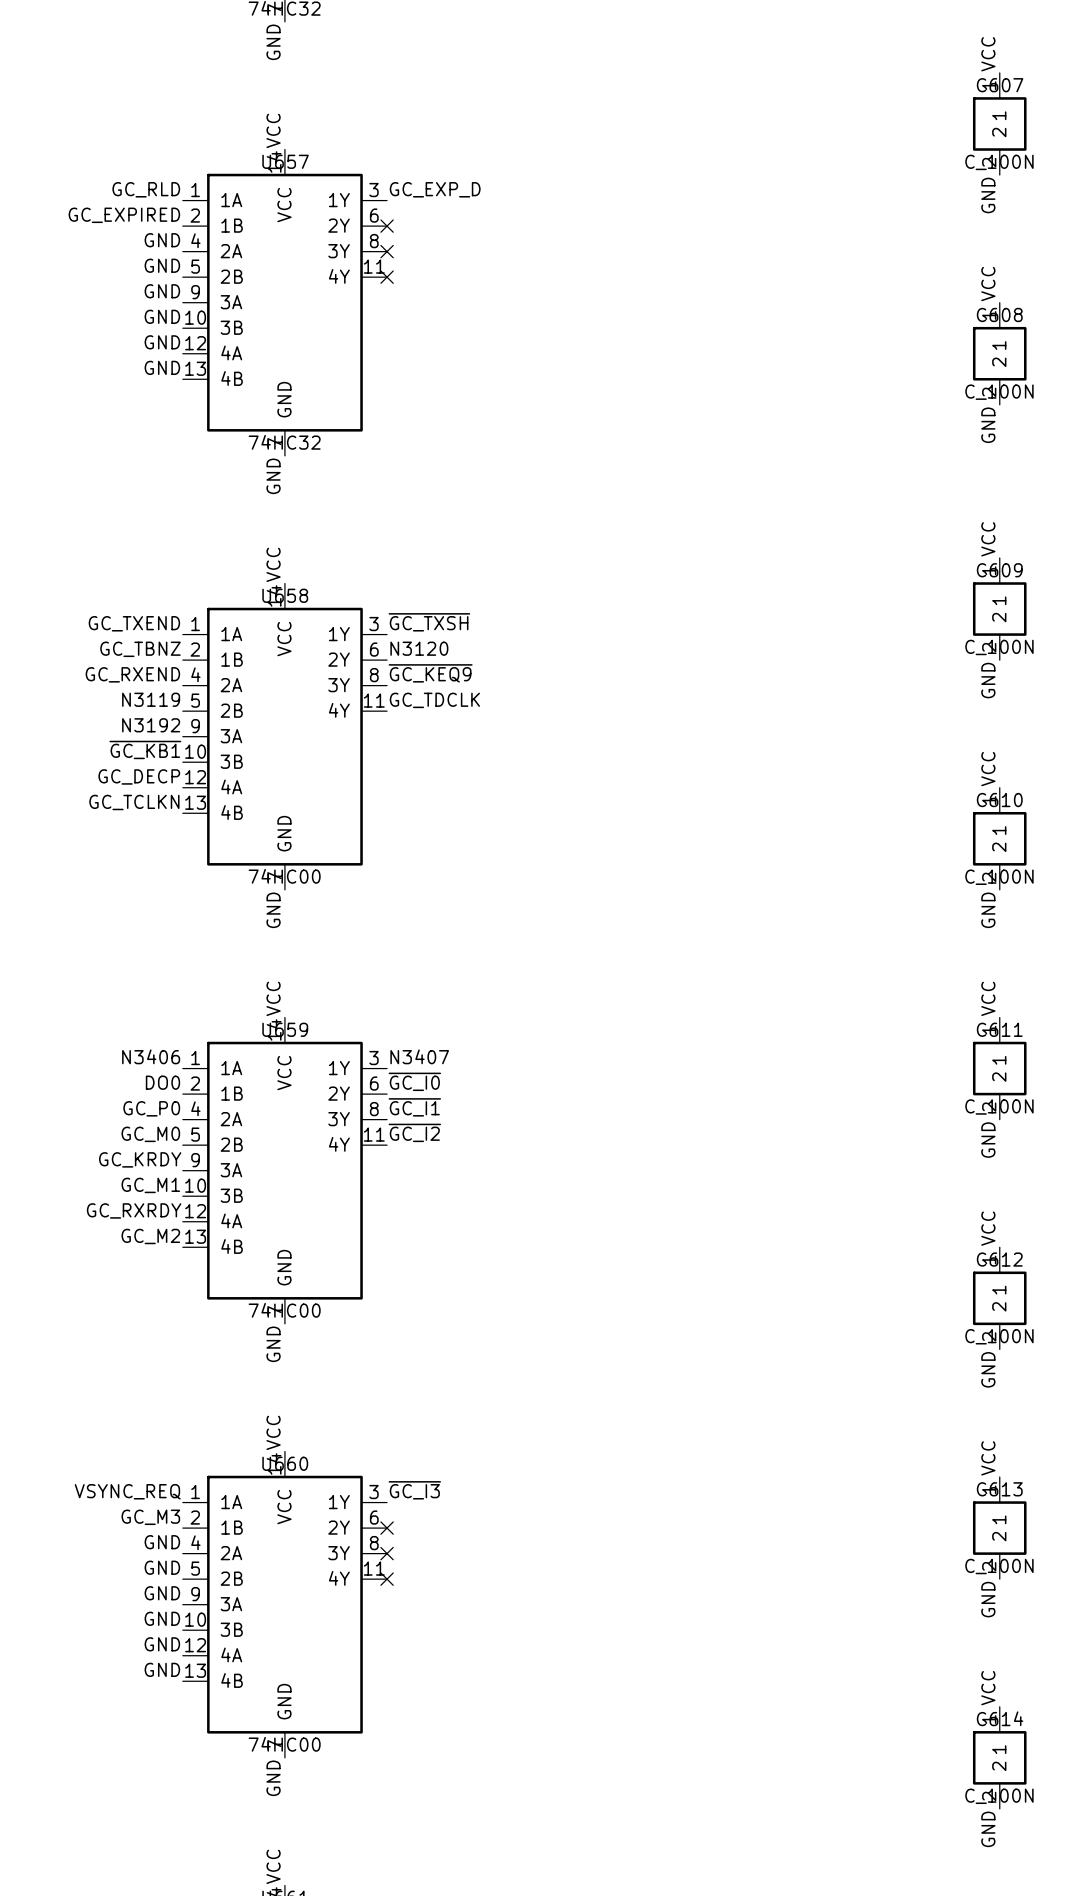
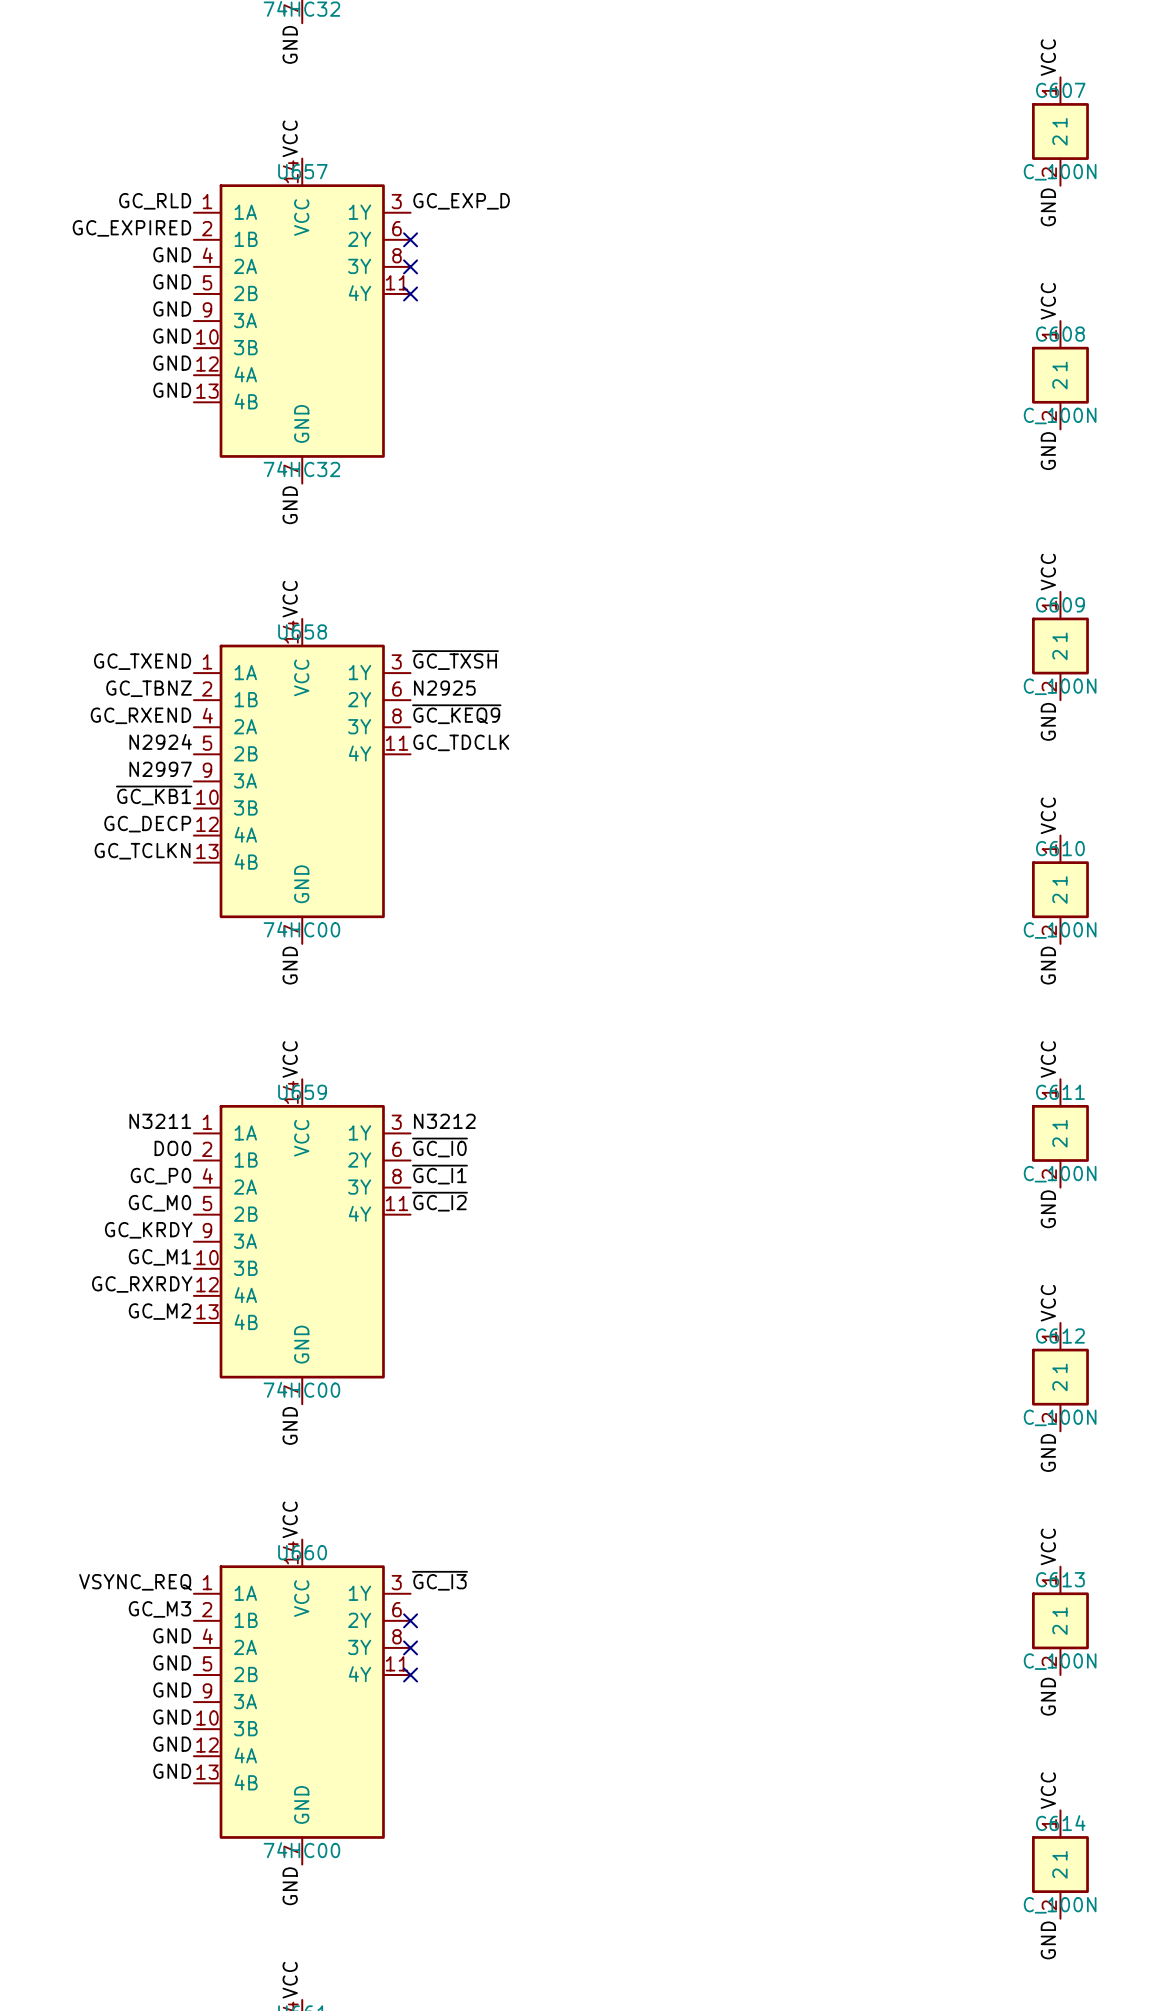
label: N3120 (419, 648) -> N2925 (444, 688)
label: N3119 (151, 699) -> N2924 (160, 741)
label: N3192 (151, 725) -> N2997 (160, 769)
label: N3406 (151, 1056) -> N3211 (160, 1121)
label: N3407 (419, 1056) -> N3212 (444, 1121)

